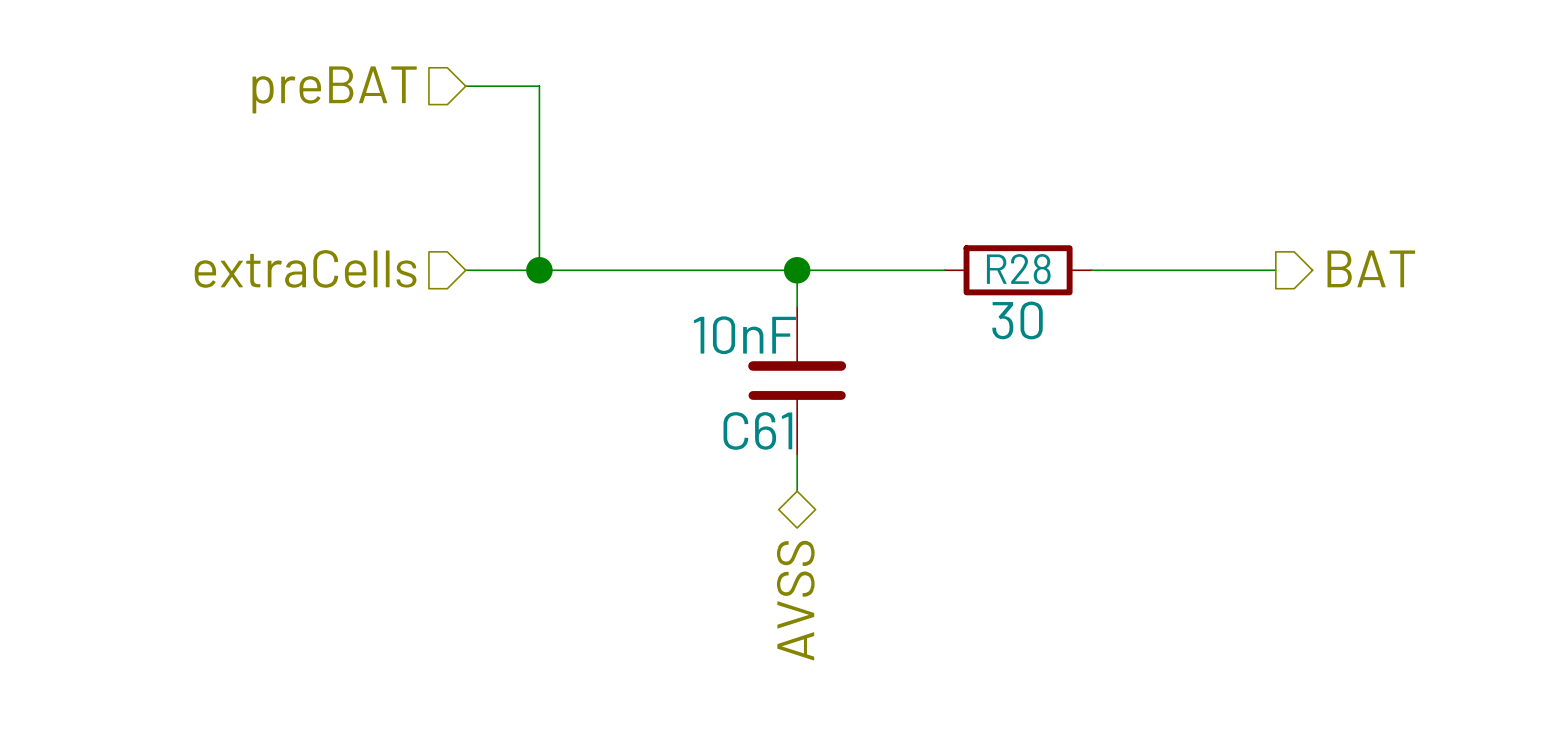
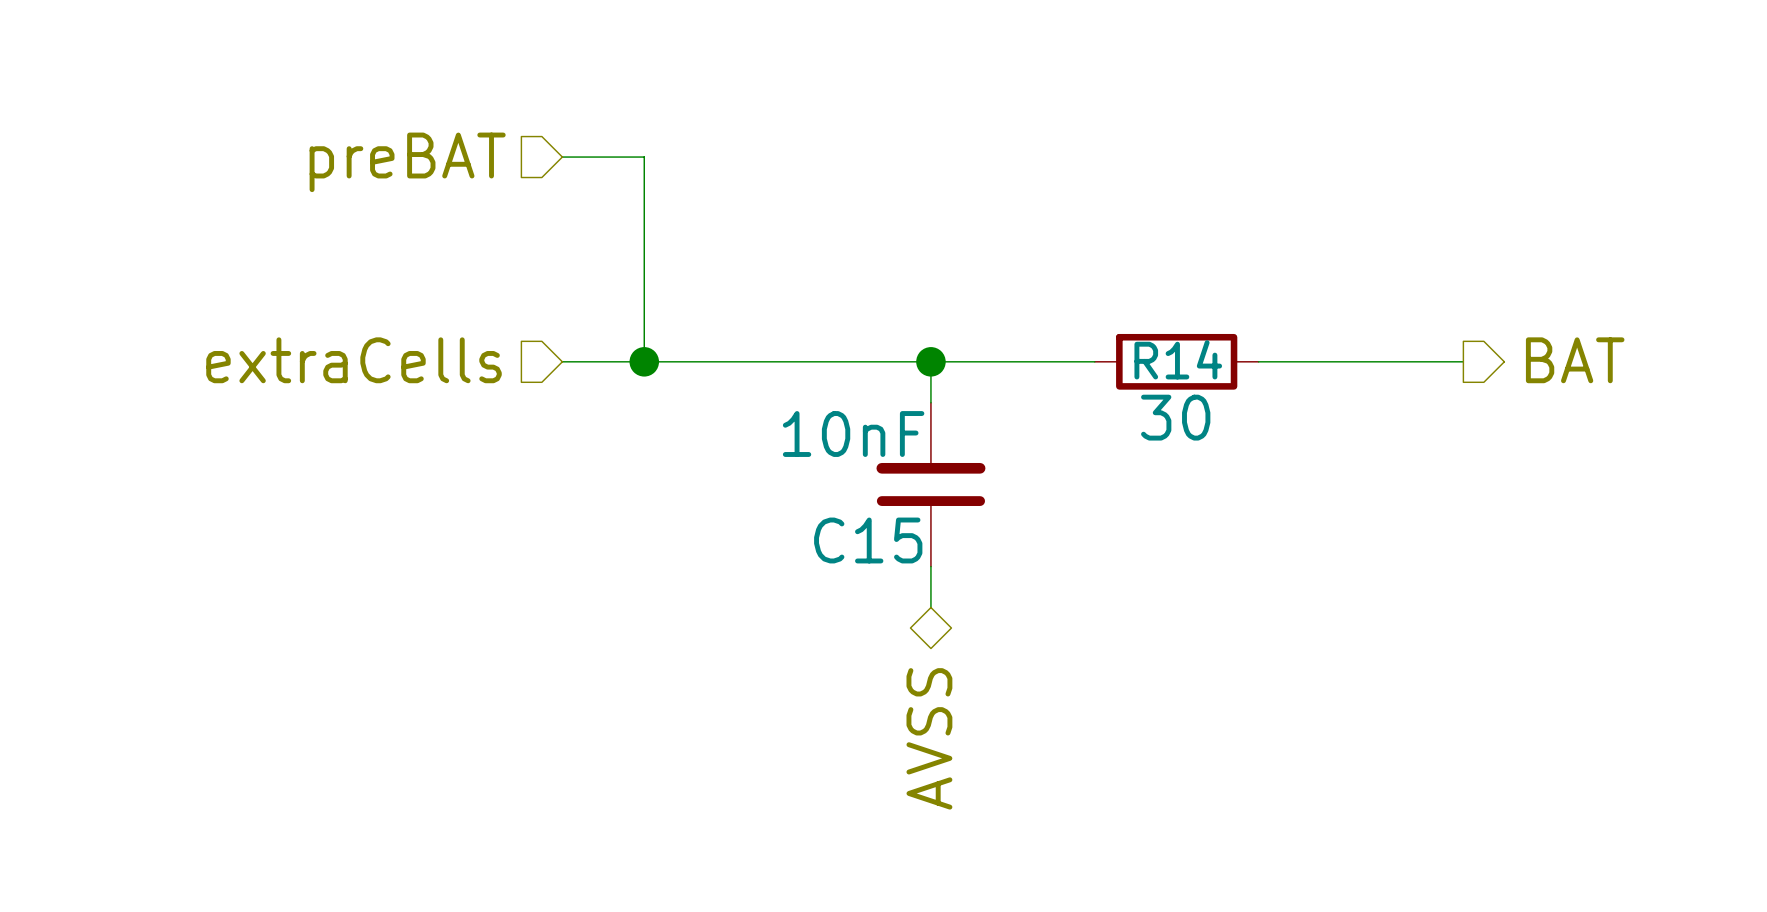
R28 name: R28 (1018, 269) -> R14 (1178, 359)
C61 name: C61 (757, 430) -> C15 (868, 540)

